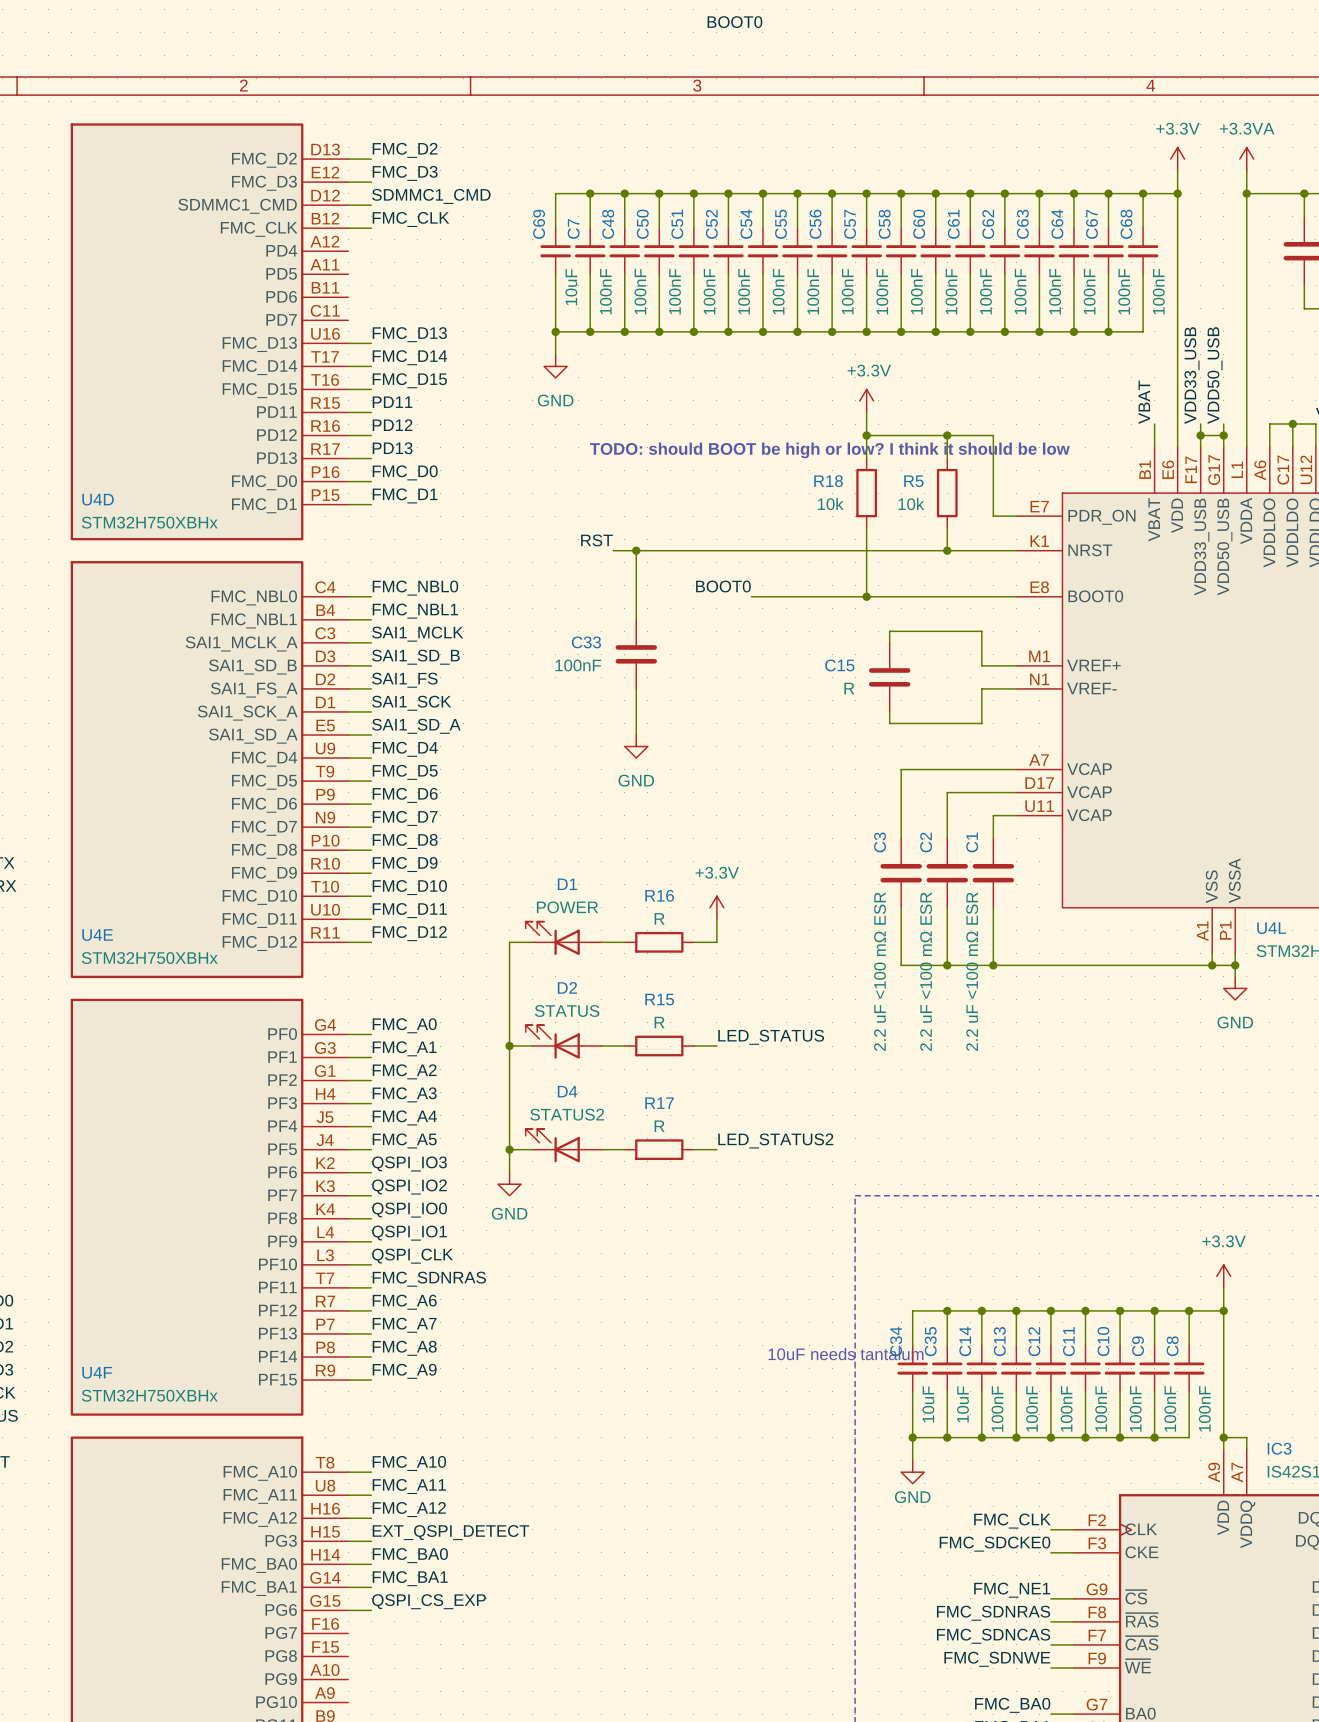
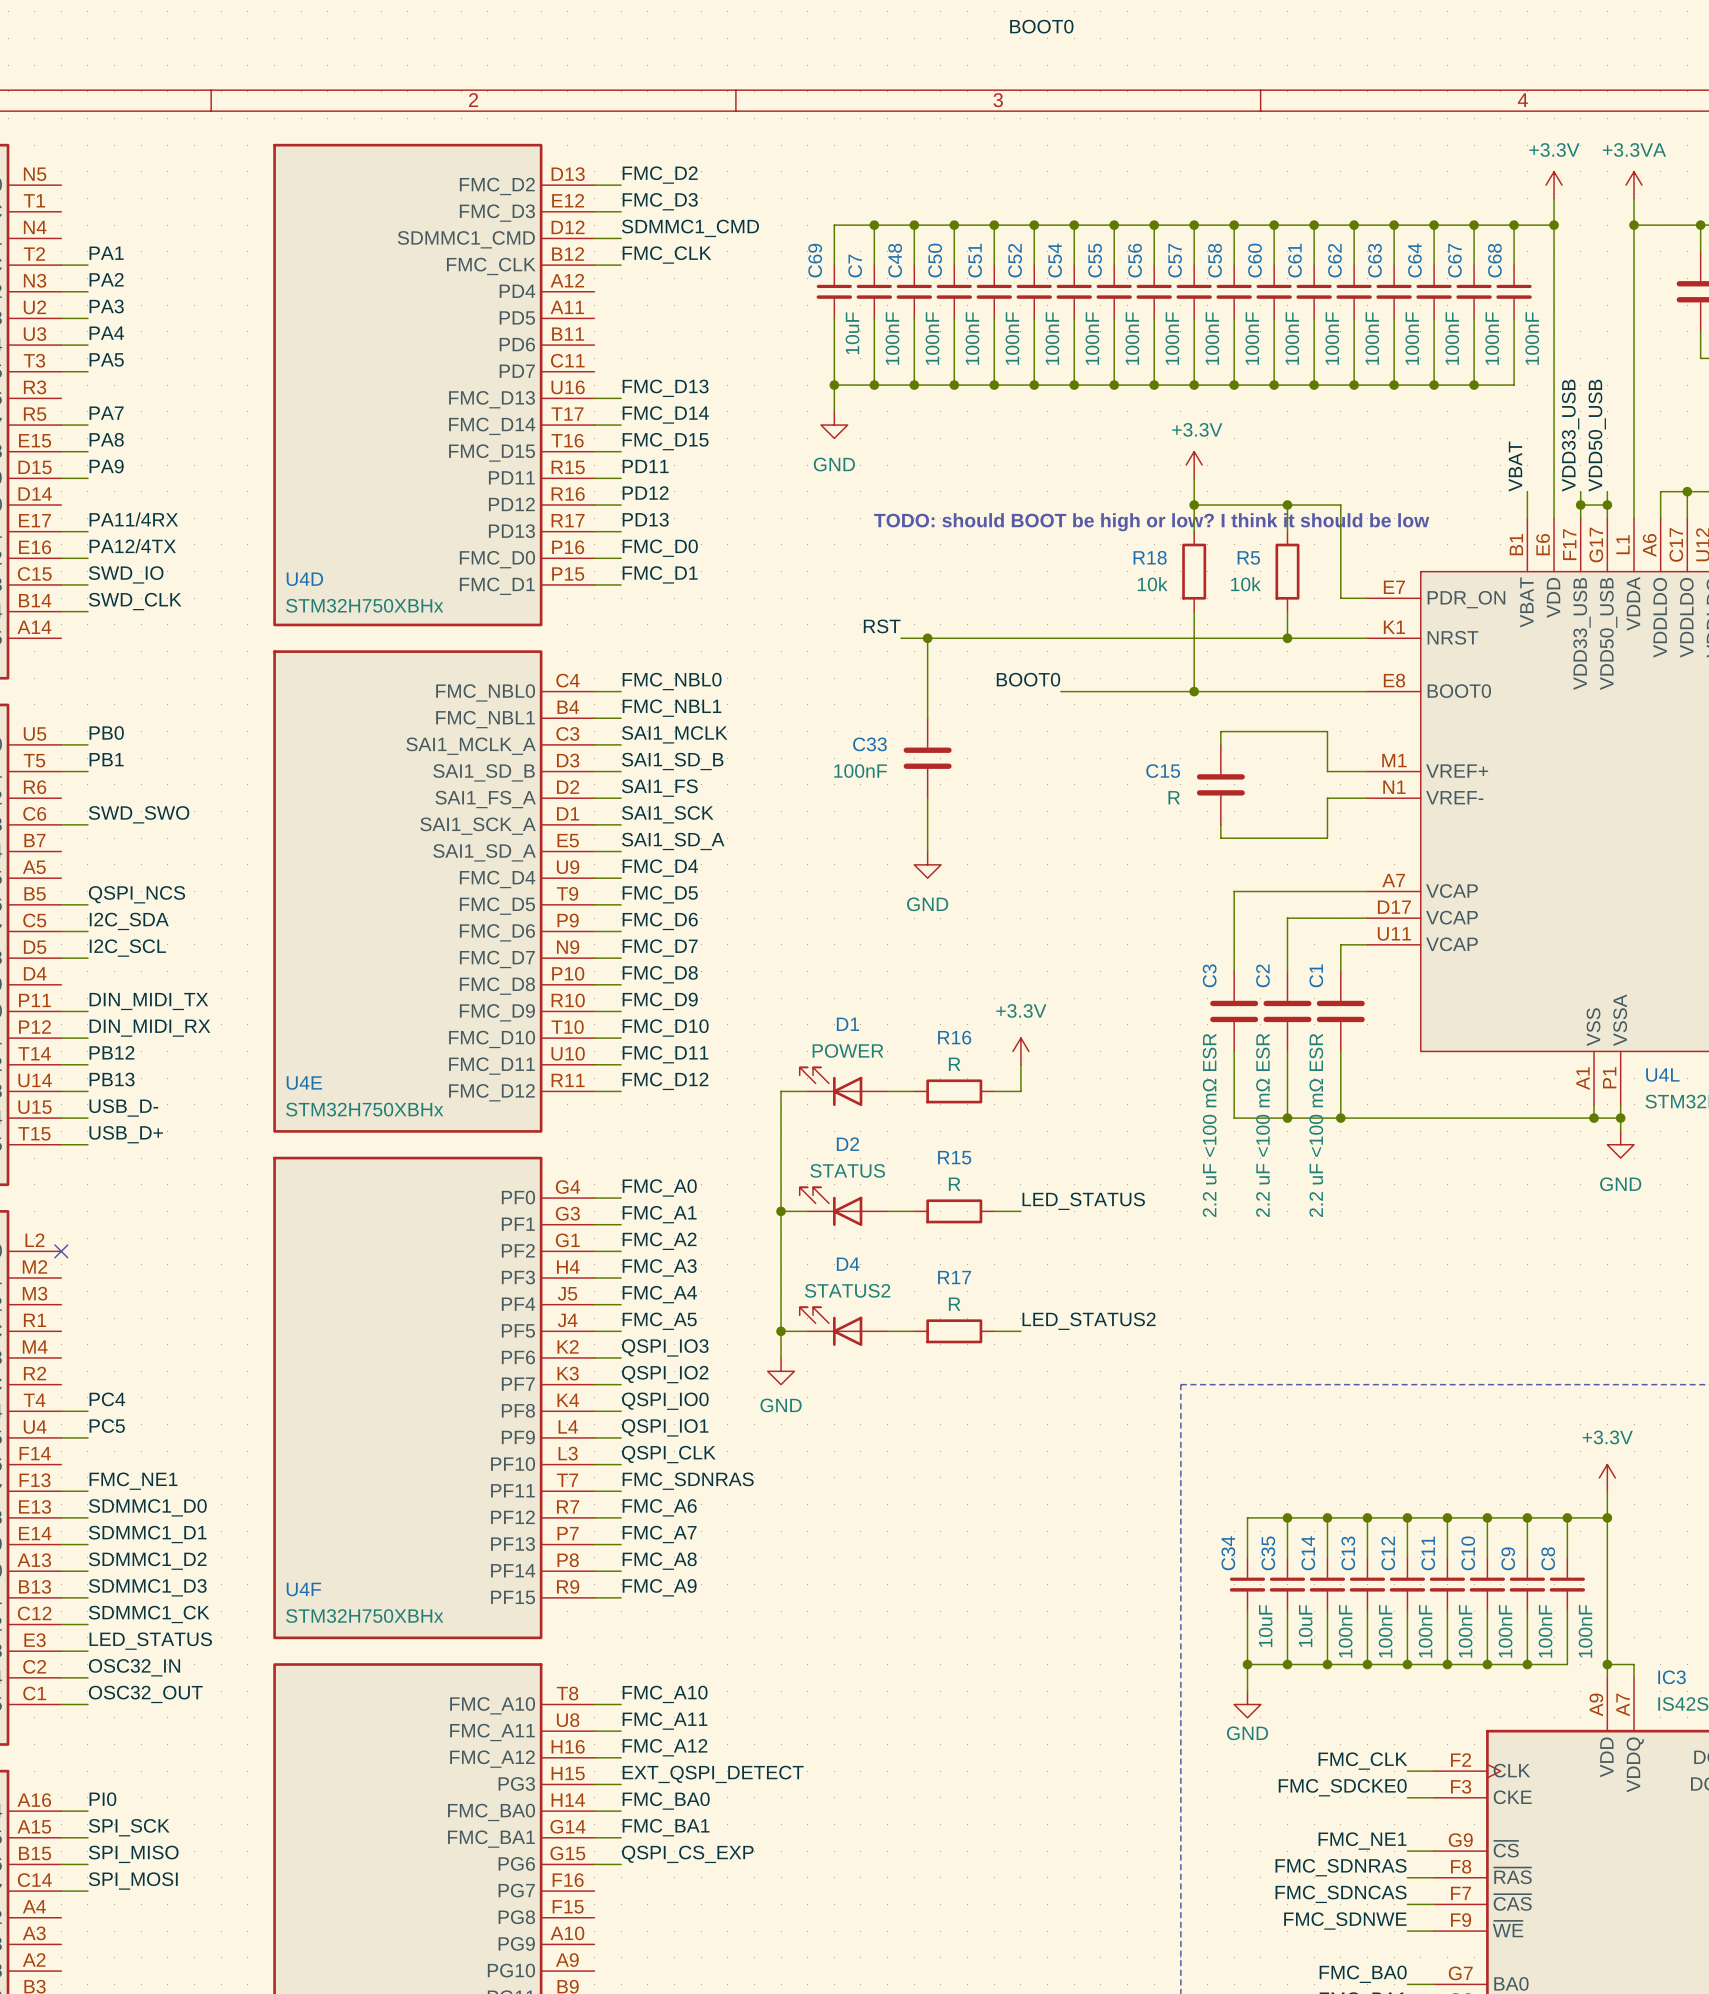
text: 10uF needs tantalum (845, 1354) -> none

